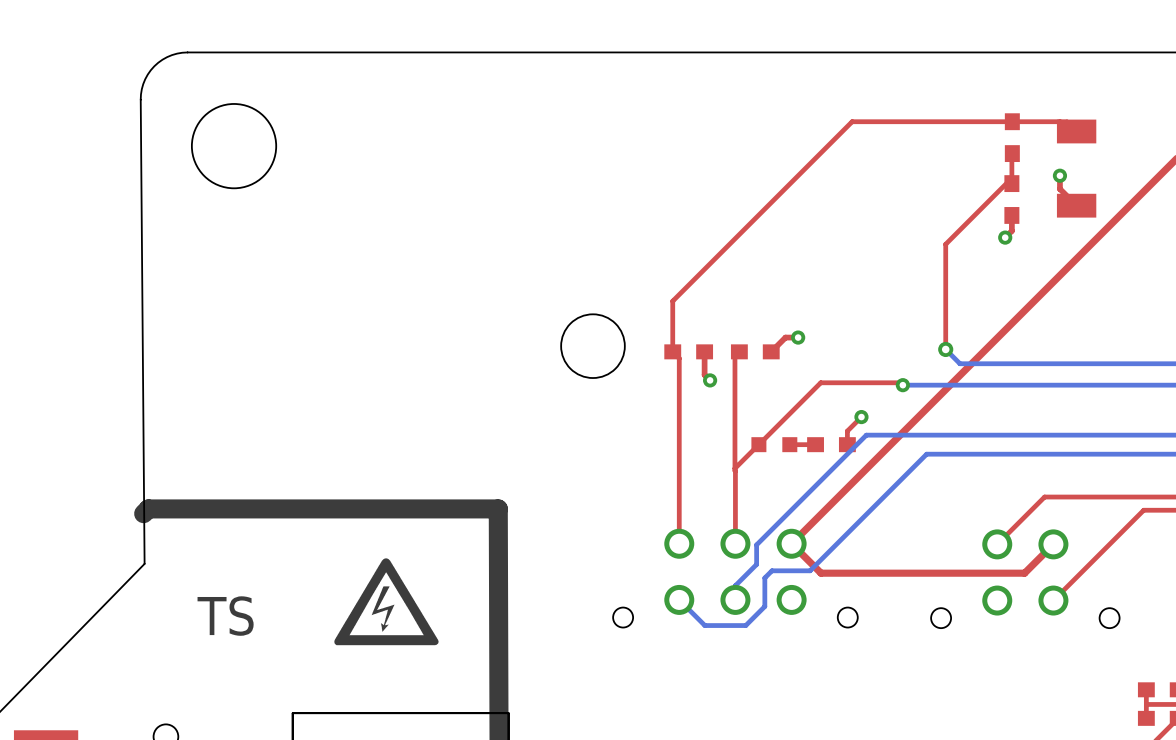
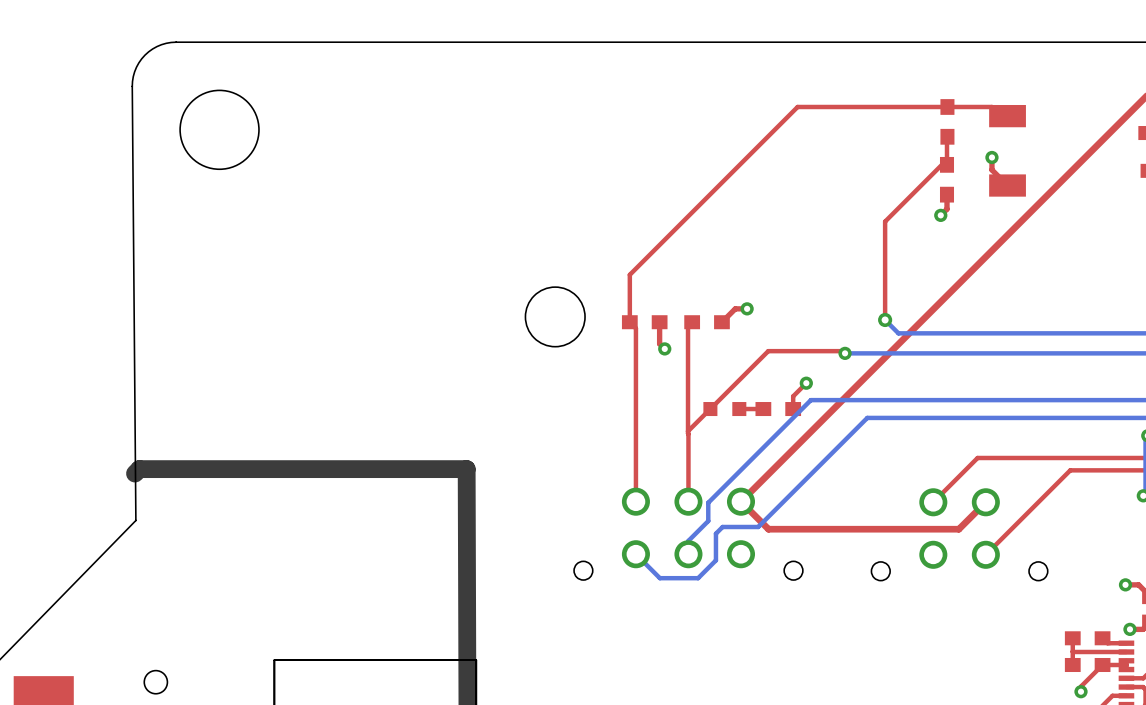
drawing: [334, 558, 439, 646] -> none
drawing: [197, 596, 254, 636] -> none

